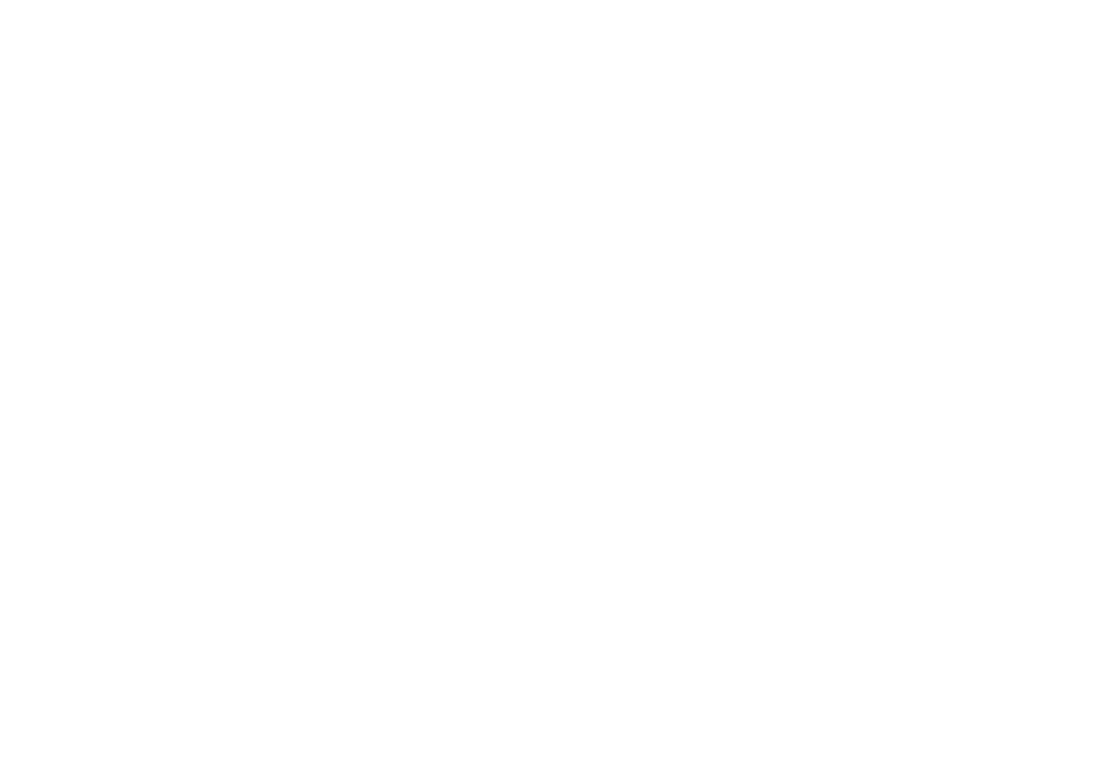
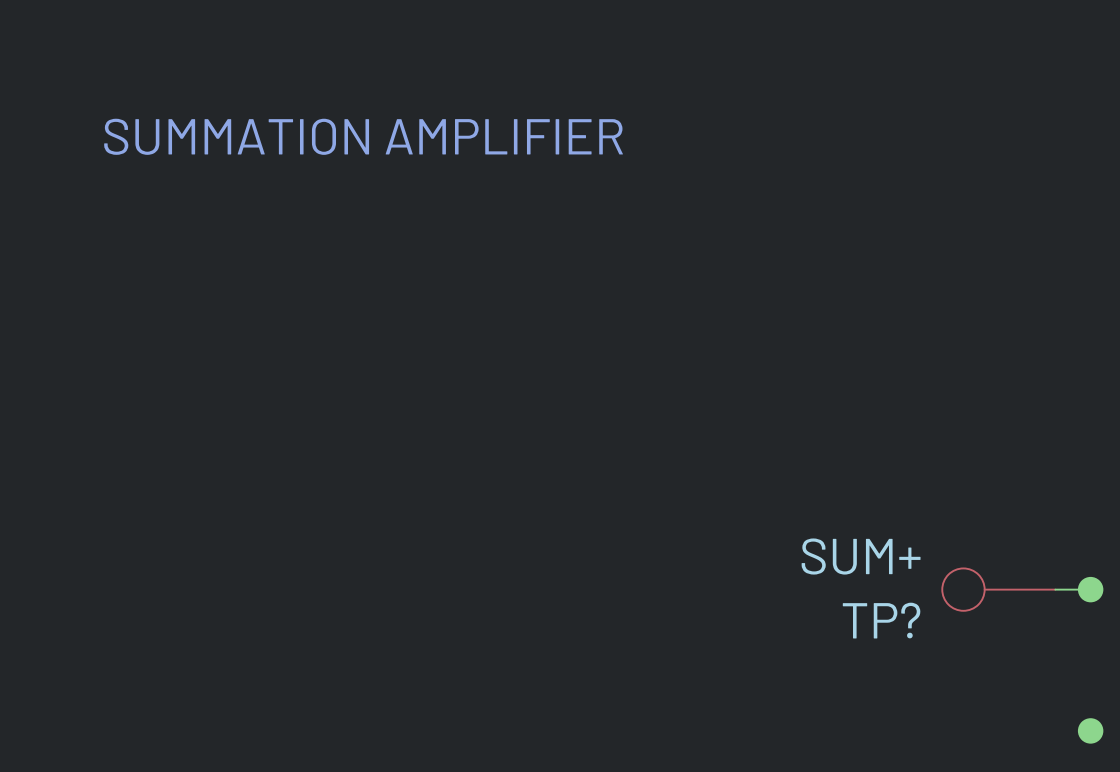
text: none -> SUMMATION AMPLIFIER (363, 136)
TP?: none -> SUM+ (998, 589)
wire: none -> (1055, 589) (1090, 589)
junction: none -> (1090, 589)
junction: none -> (1090, 730)

